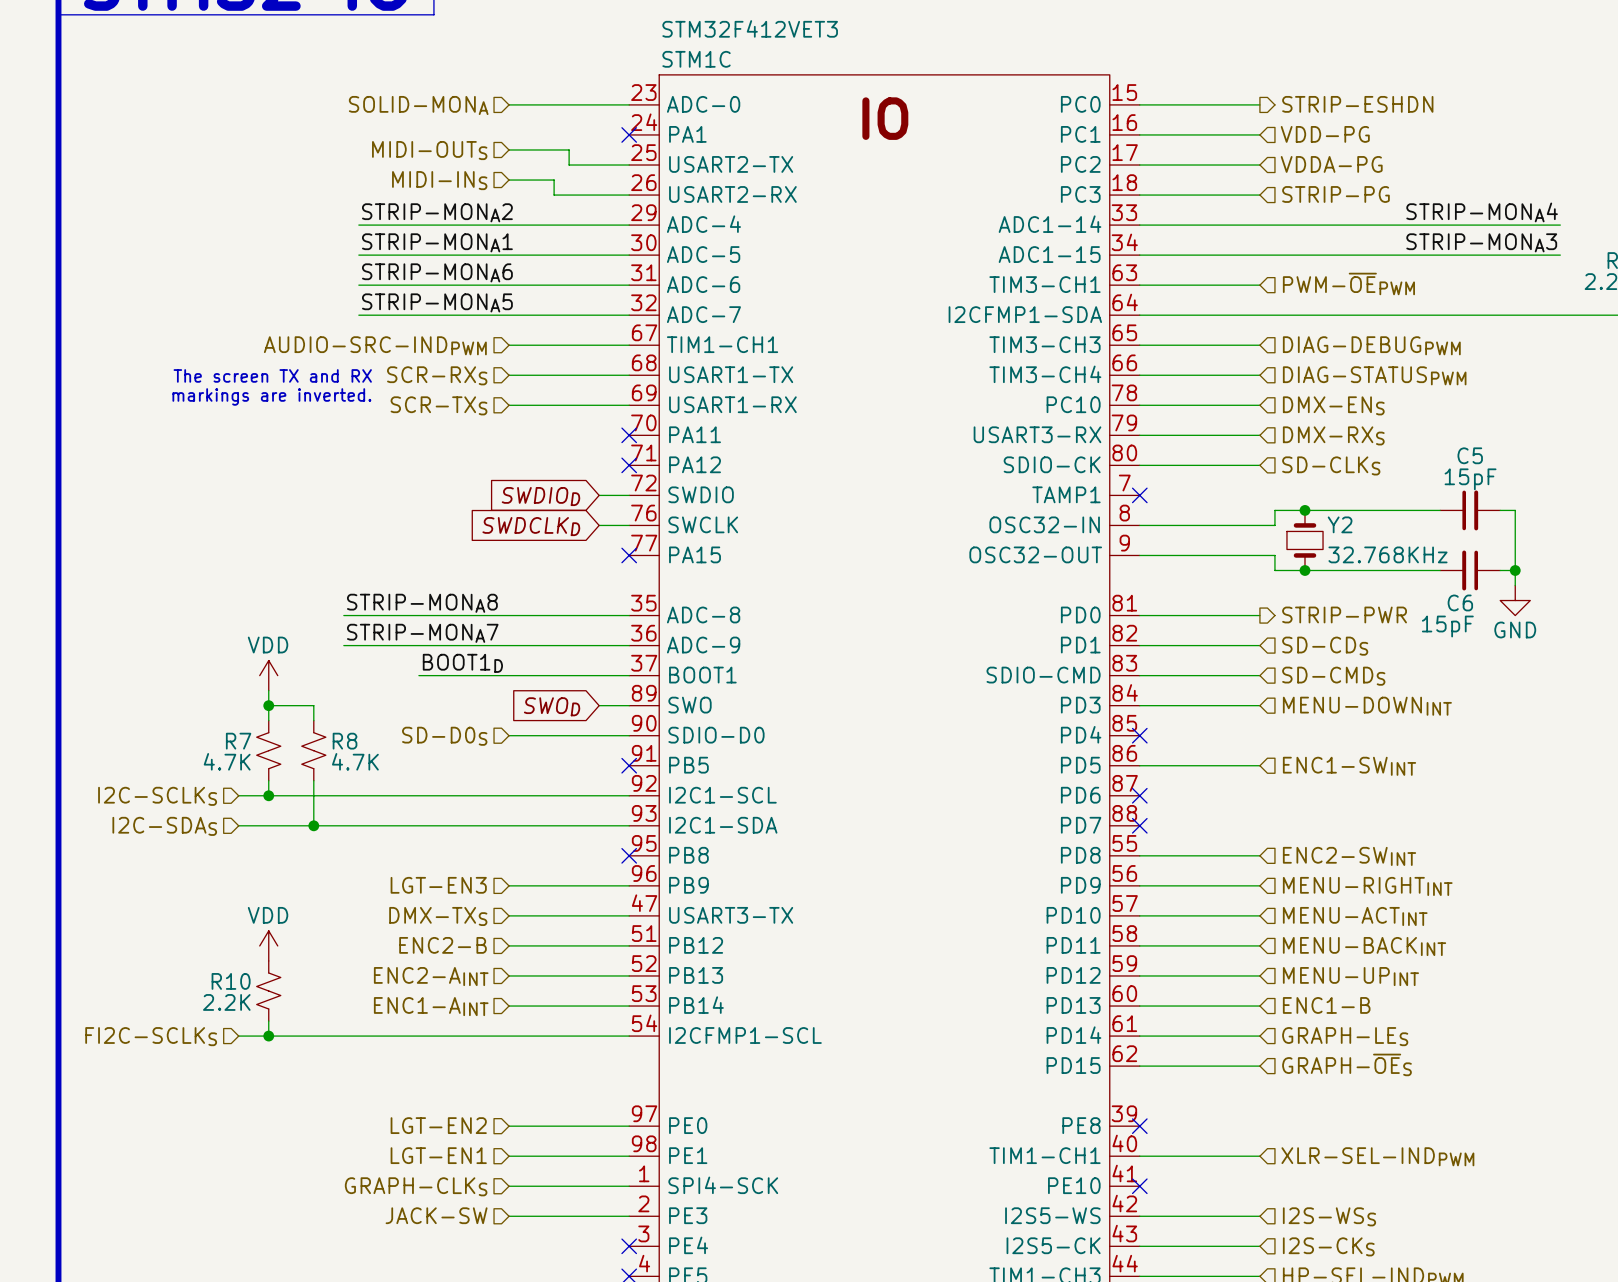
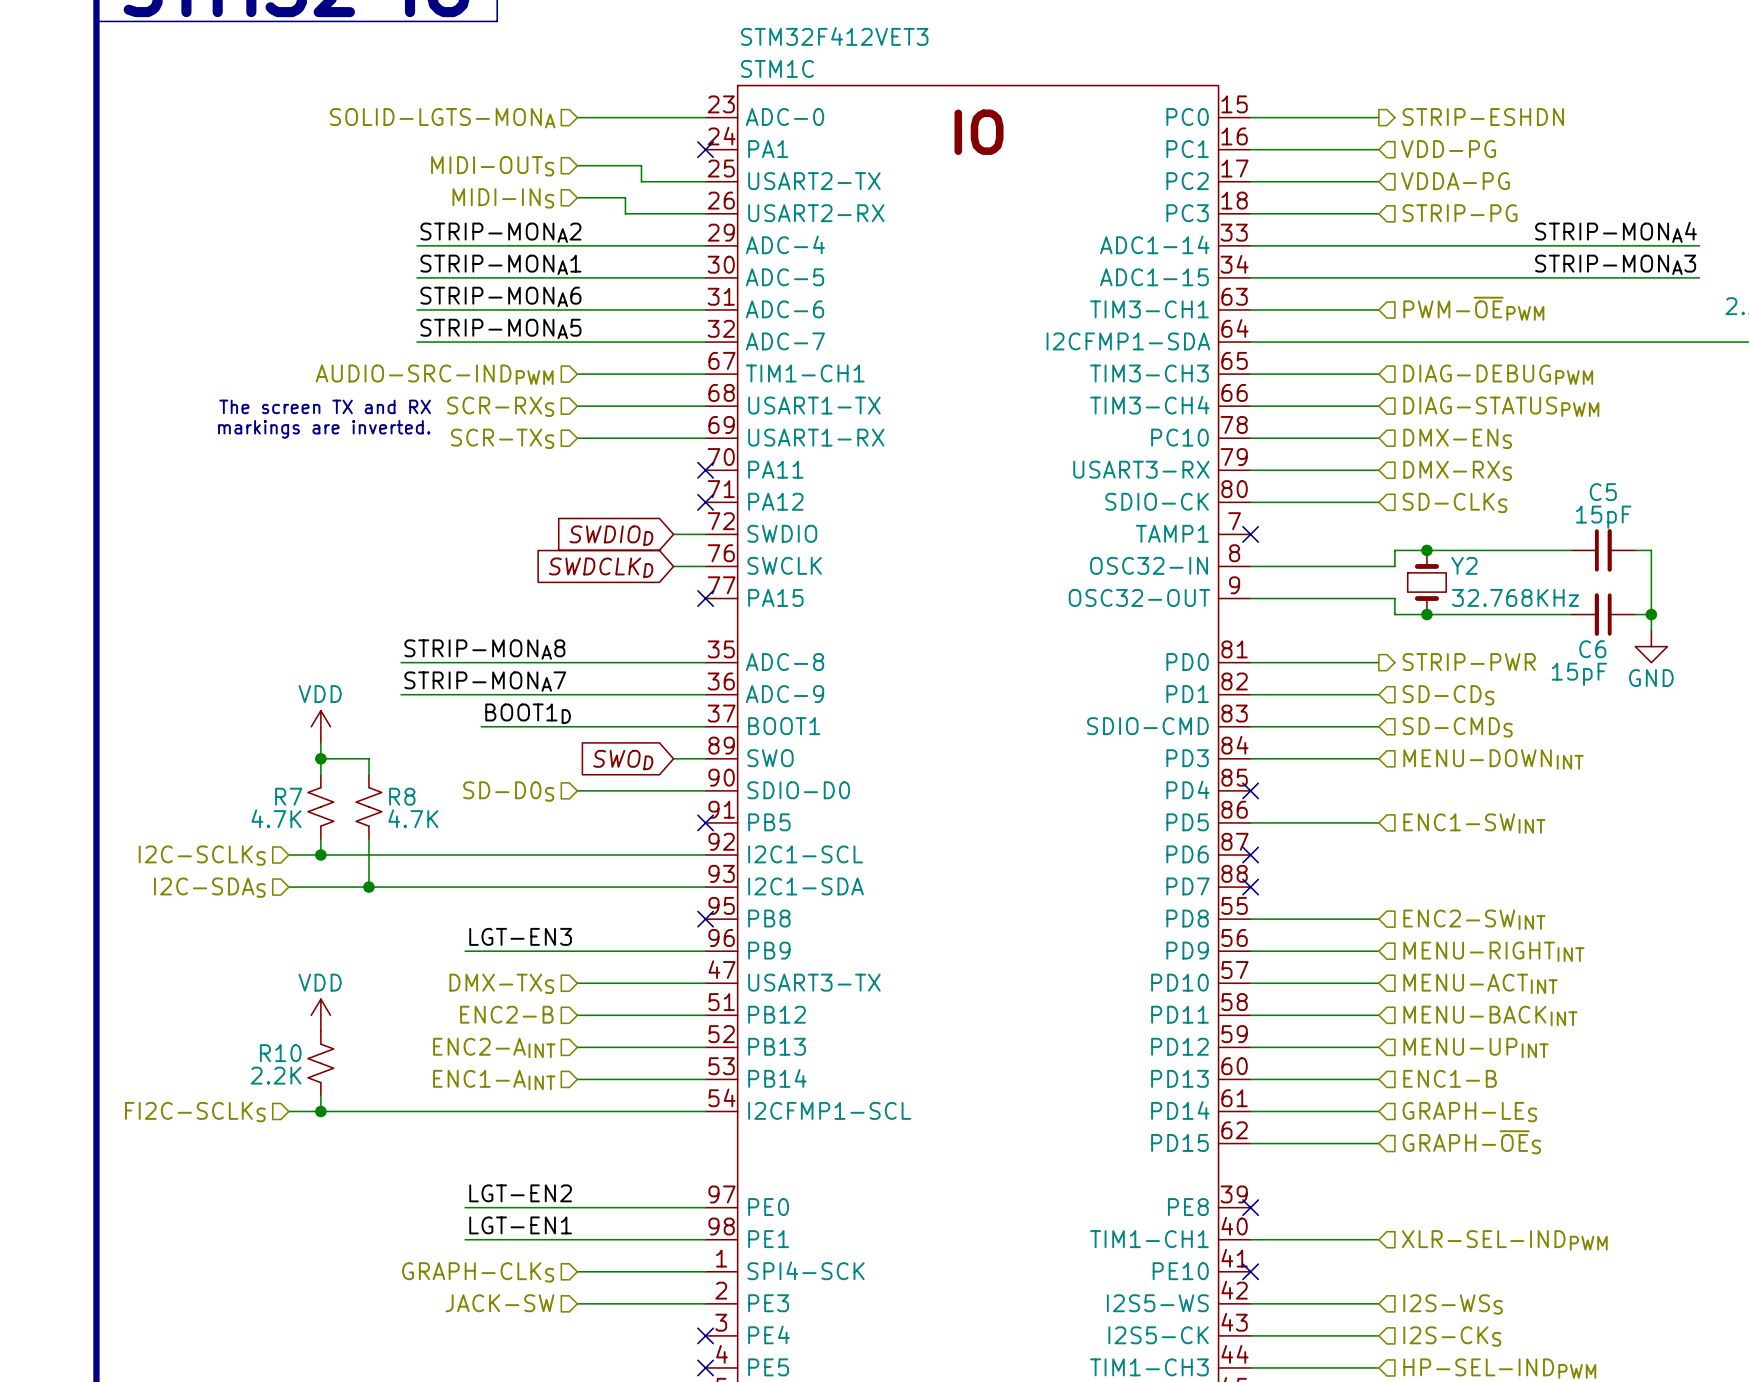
hierarchical label: SOLID-MONA (418, 105) -> SOLID-LGTS-MONA (442, 118)
label: none -> LGT-EN3 (520, 936)
wire: none -> (465, 951) (577, 951)
hierarchical label: LGT-EN3 (438, 885) -> none
label: none -> LGT-EN2 (520, 1193)
hierarchical label: LGT-EN2 (438, 1125) -> none
wire: none -> (465, 1207) (577, 1207)
label: none -> LGT-EN1 (520, 1225)
hierarchical label: LGT-EN1 (438, 1155) -> none
wire: none -> (465, 1239) (577, 1239)

